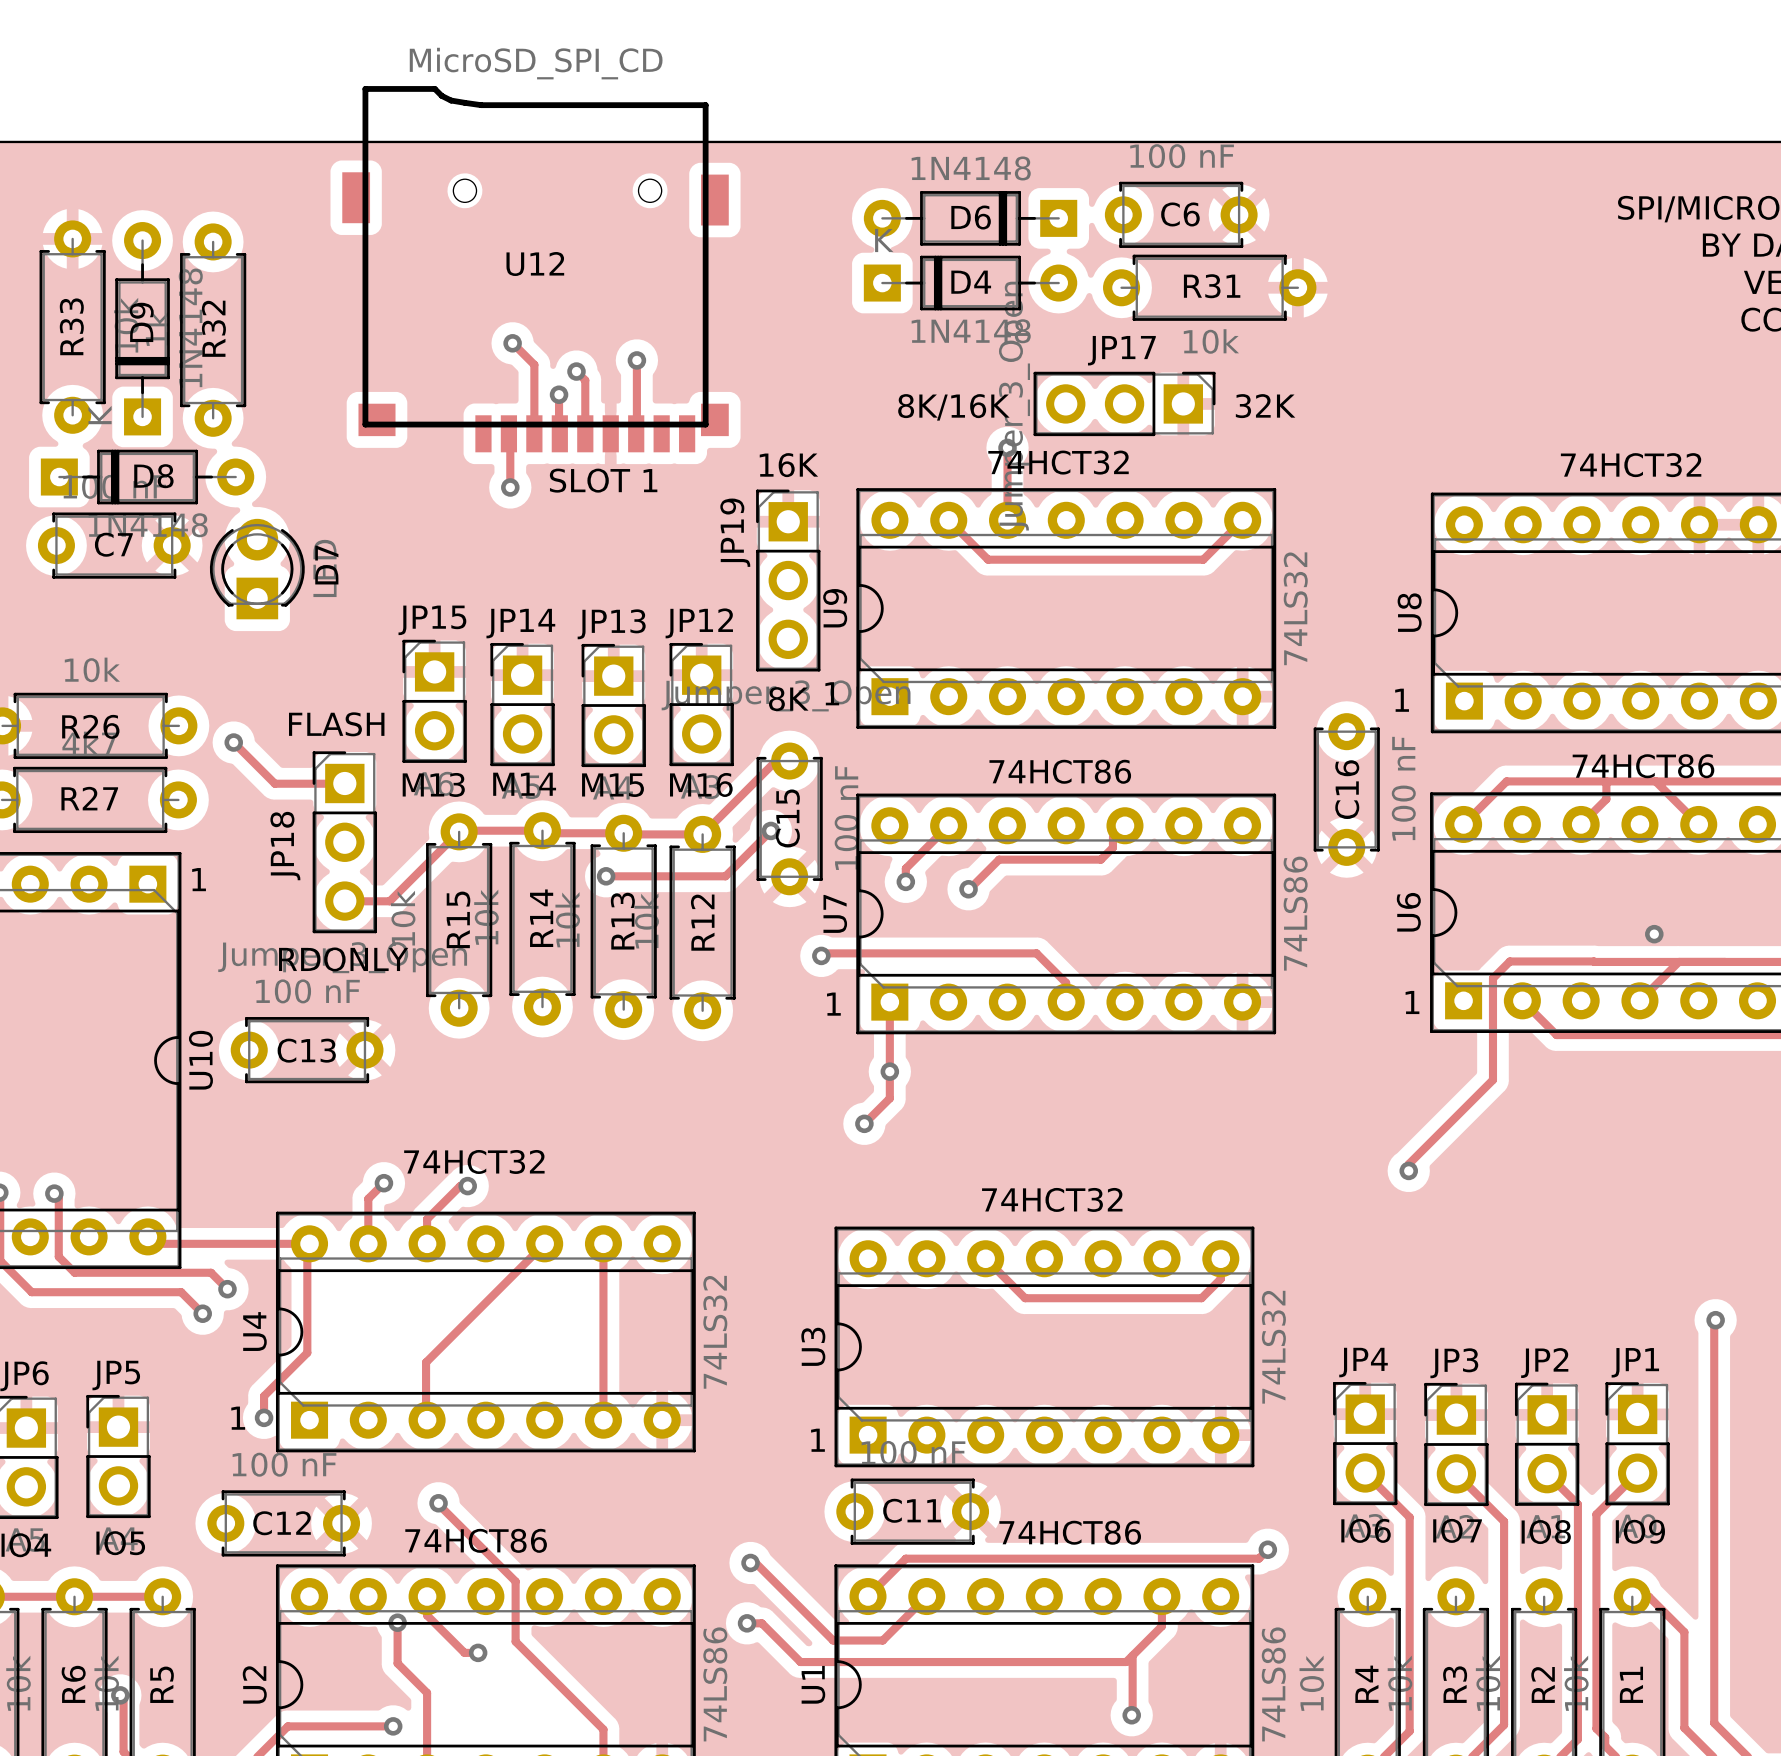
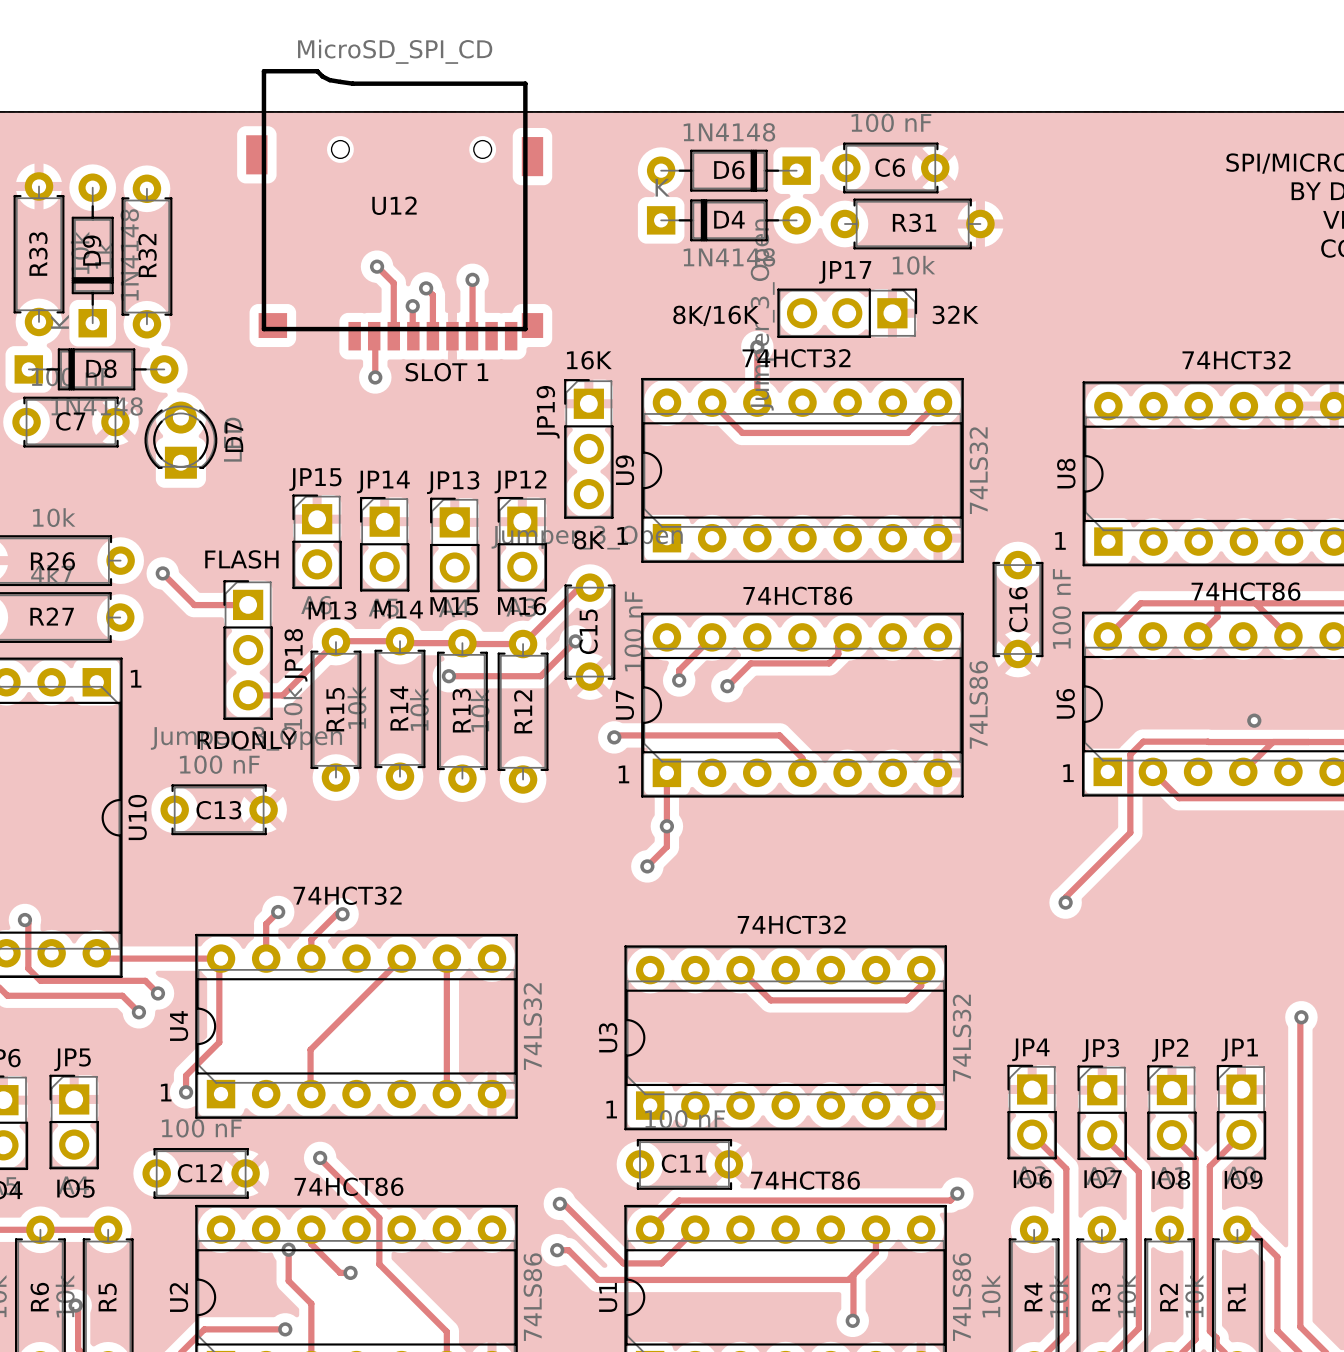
text position: M13 (433, 784) -> M13 (332, 610)
text position: M14 (524, 784) -> M14 (398, 609)
JP18 name position: JP18 (285, 846) -> JP18 (295, 655)

